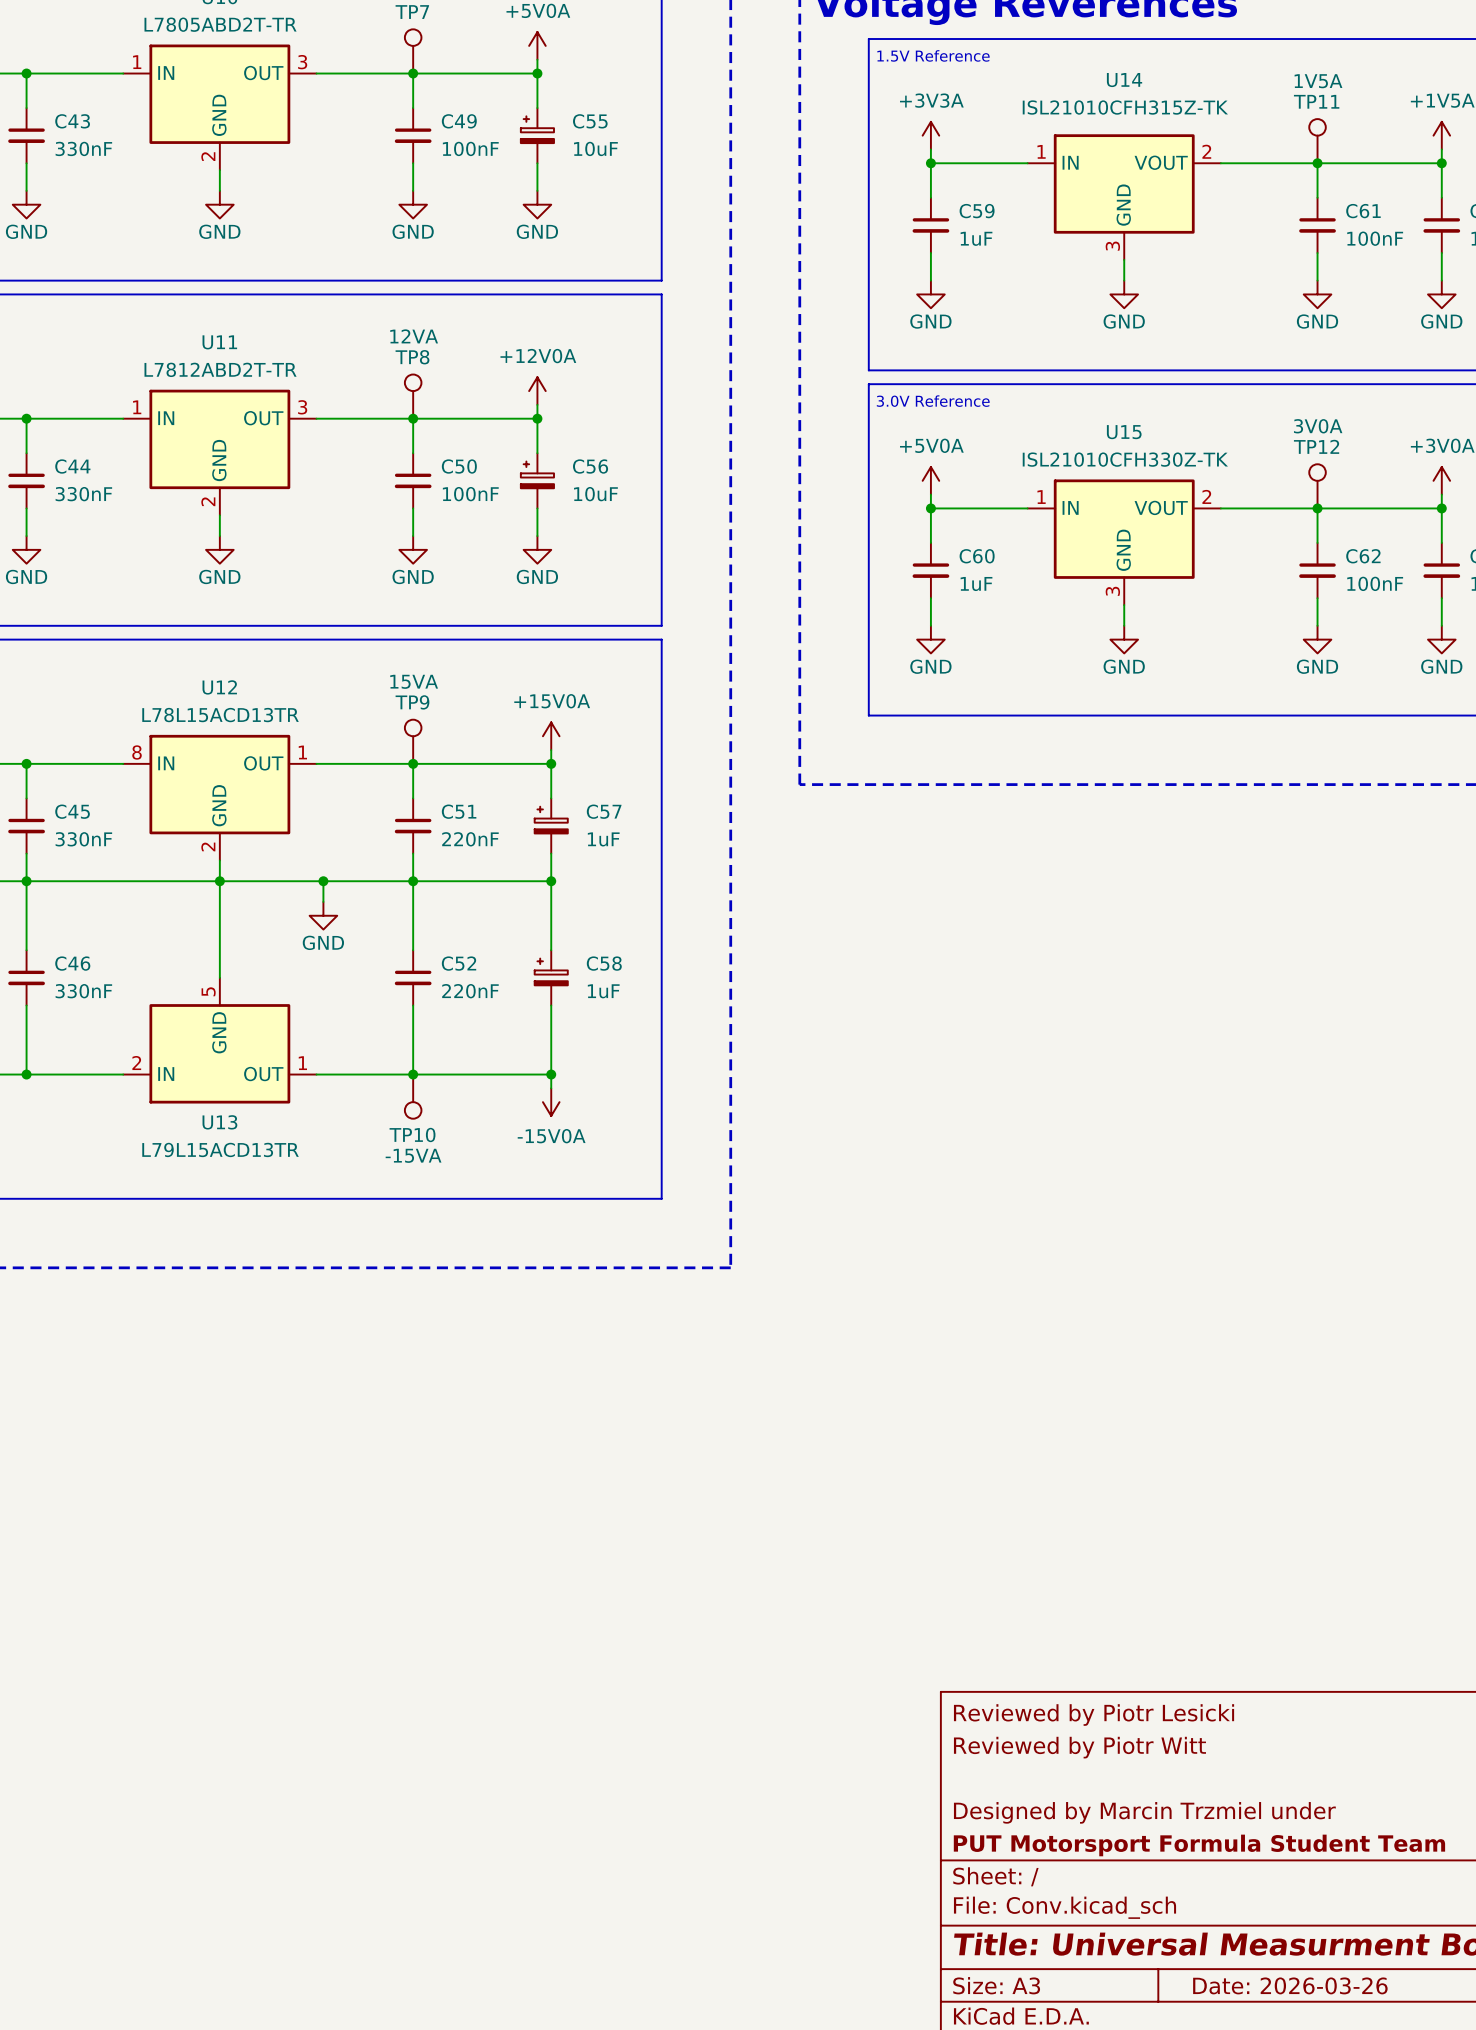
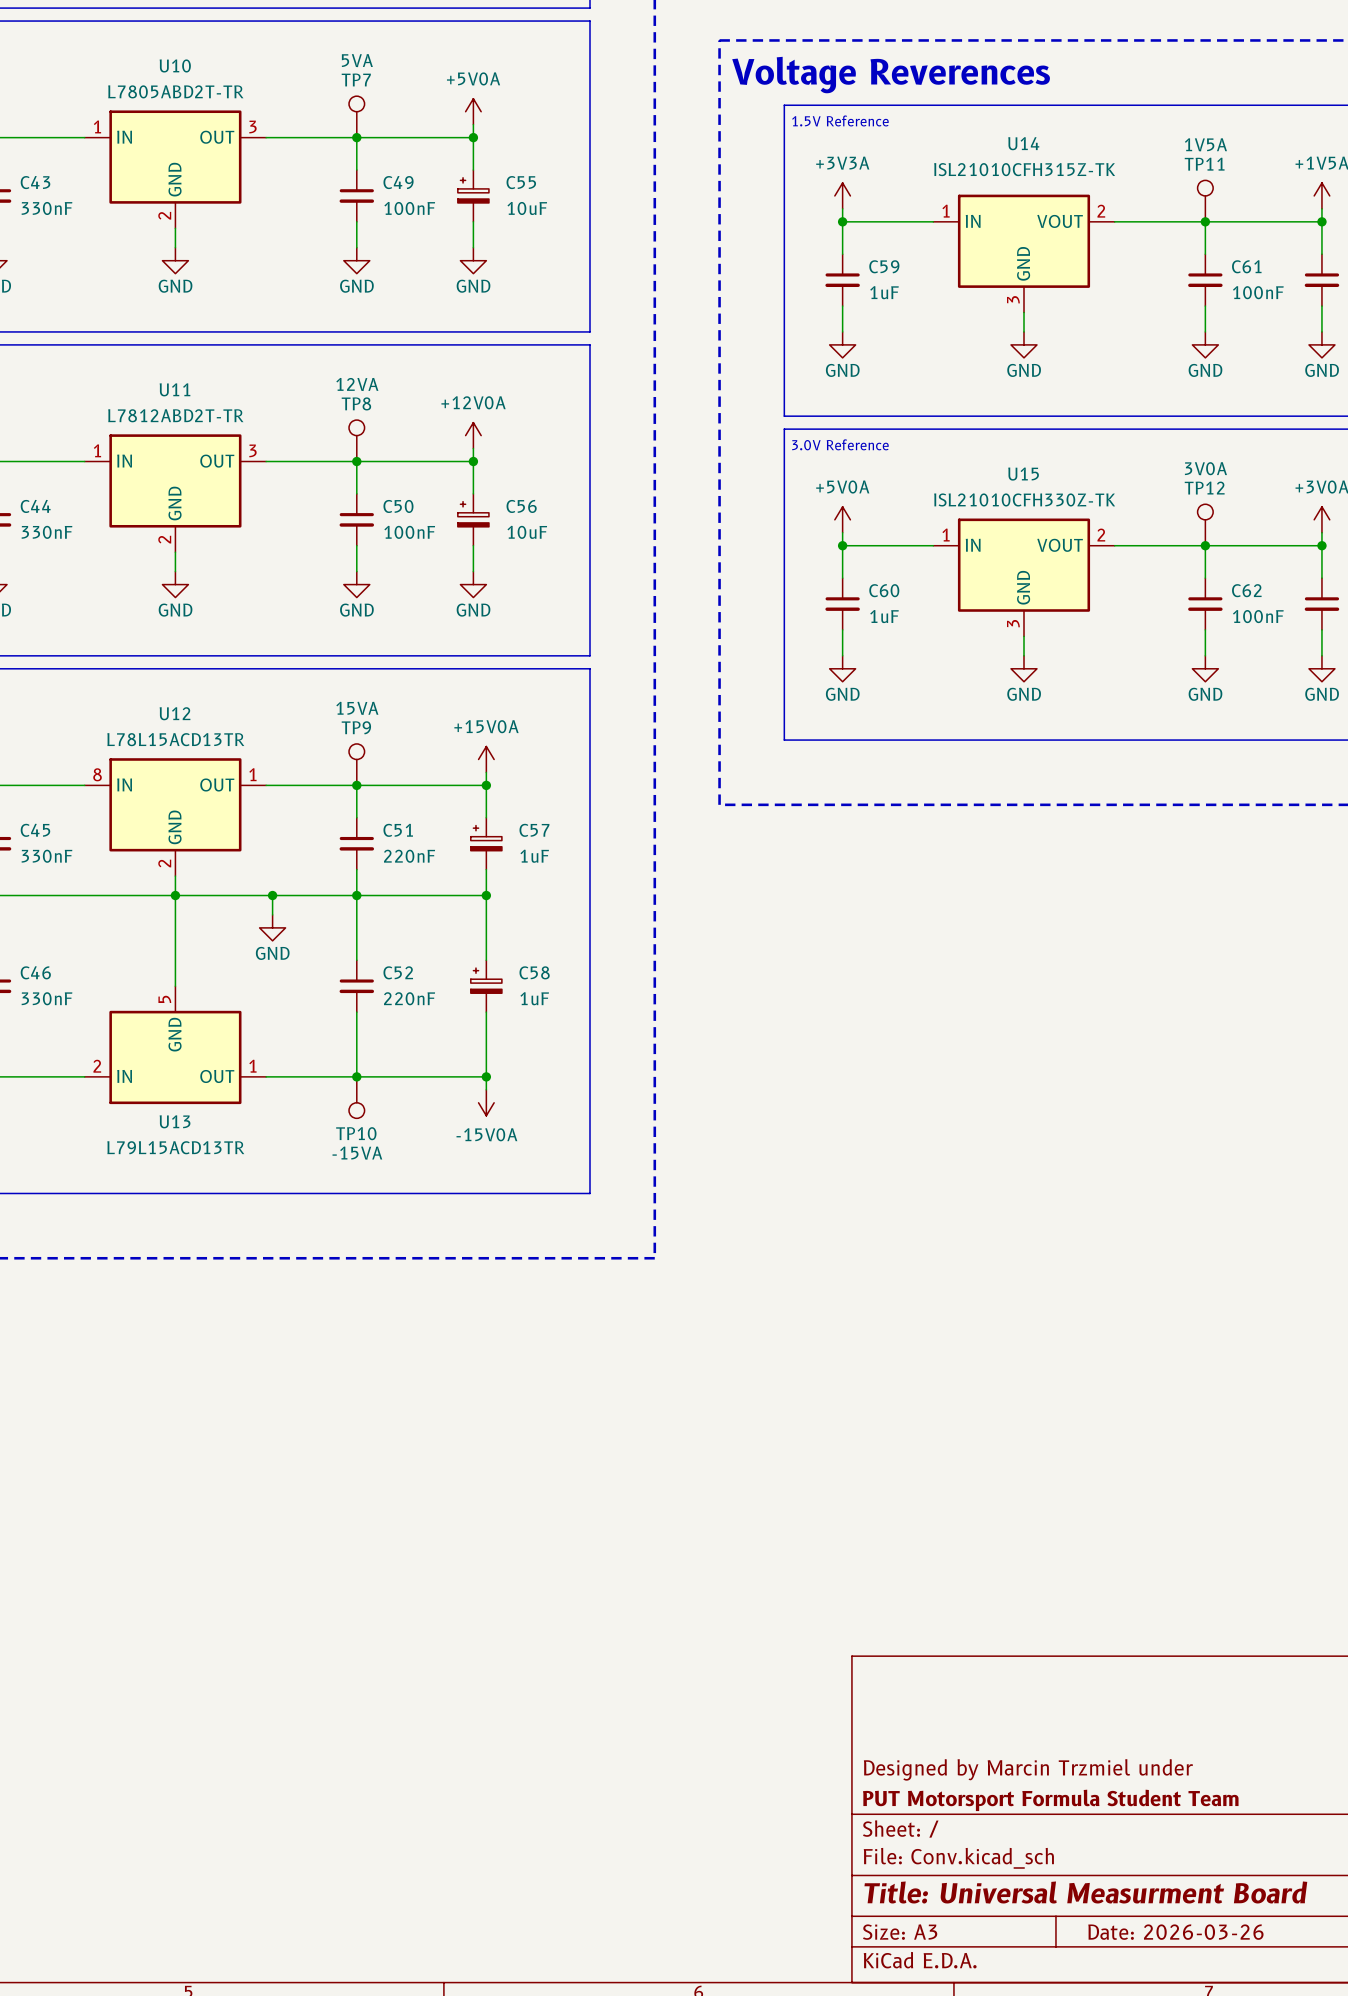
title block: Reviewed by Piotr Lesicki (1094, 1715) -> none
title block: Reviewed by Piotr Witt (1079, 1747) -> none

